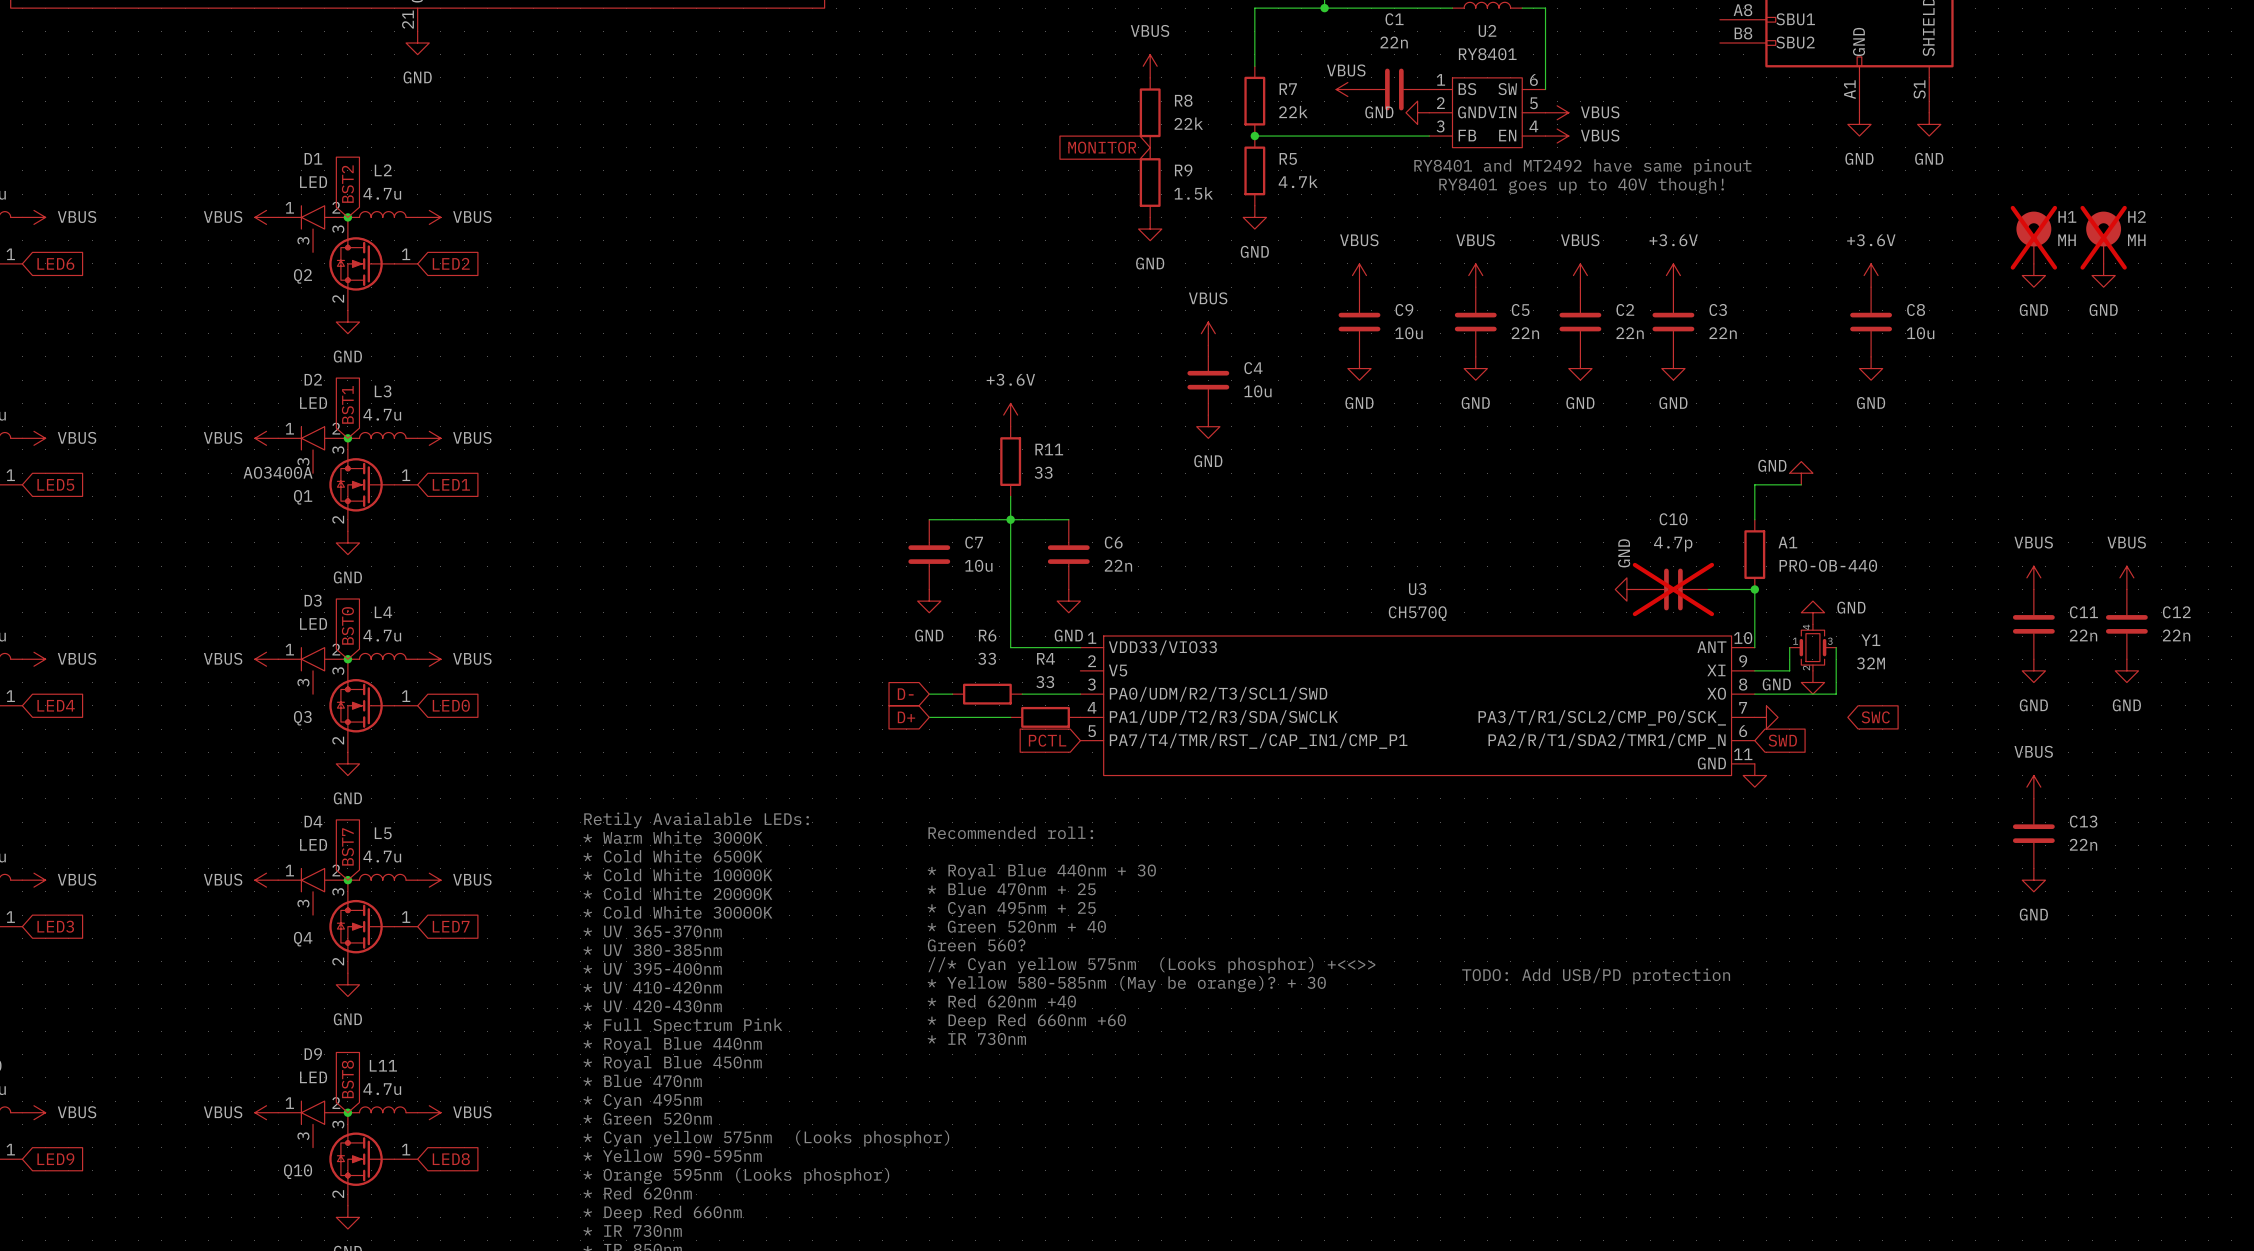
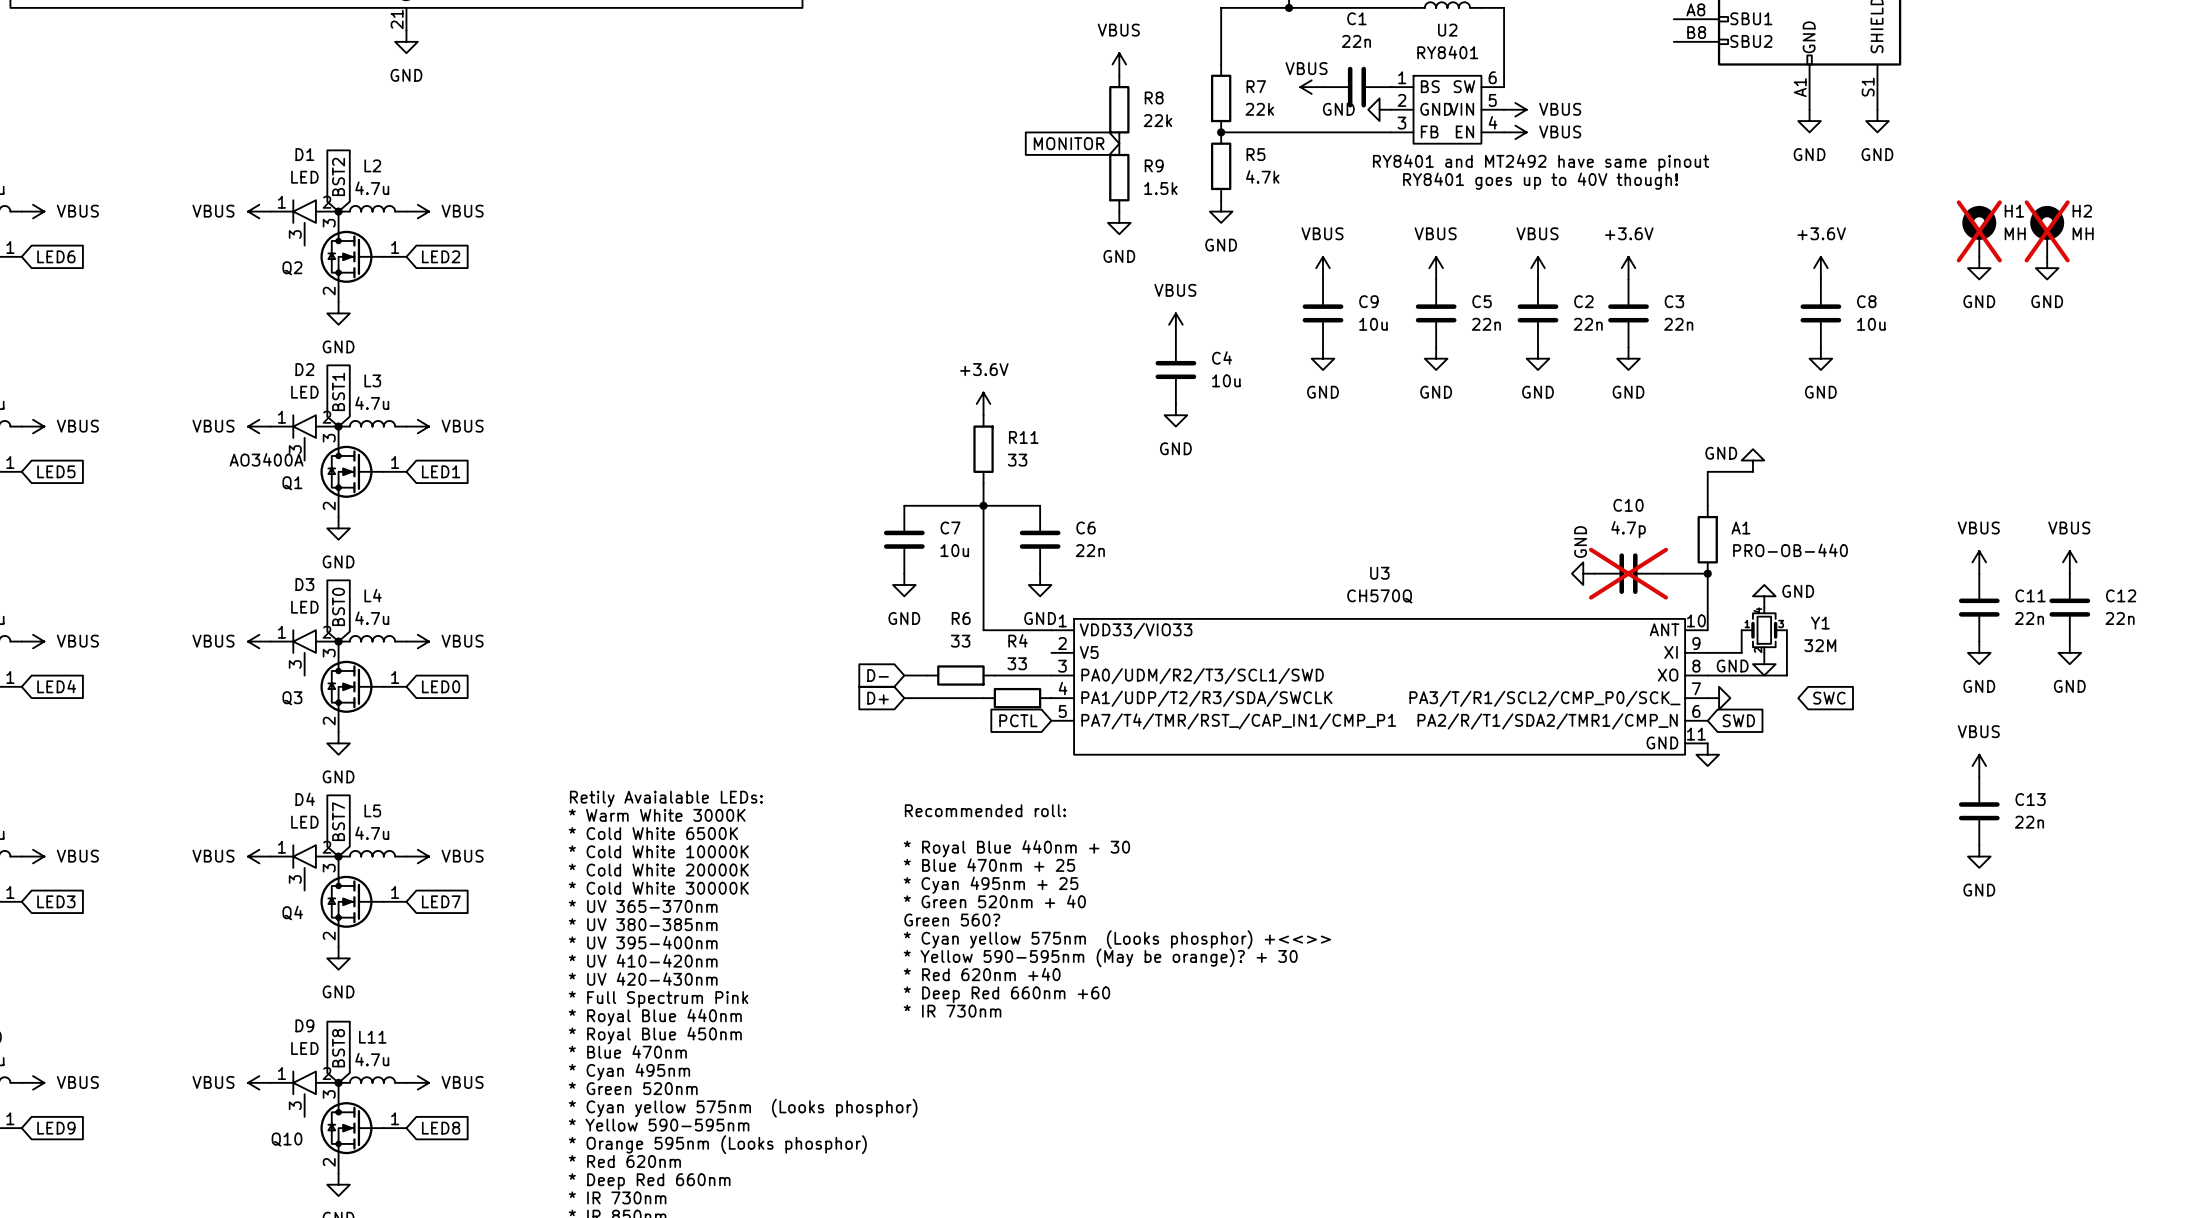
text: //* Cyan yellow 575nm (Looks phosphor) +<<>> (1151, 965) -> * Cyan yellow 575nm (Looks phosphor) +<<>> (1117, 939)
text: TODO: Add USB/PD protection (1596, 976) -> none
text: * Yellow 580-585nm (May be orange)? + 30 (1126, 984) -> * Yellow 590-595nm (May be orange)? + 30 (1100, 957)

